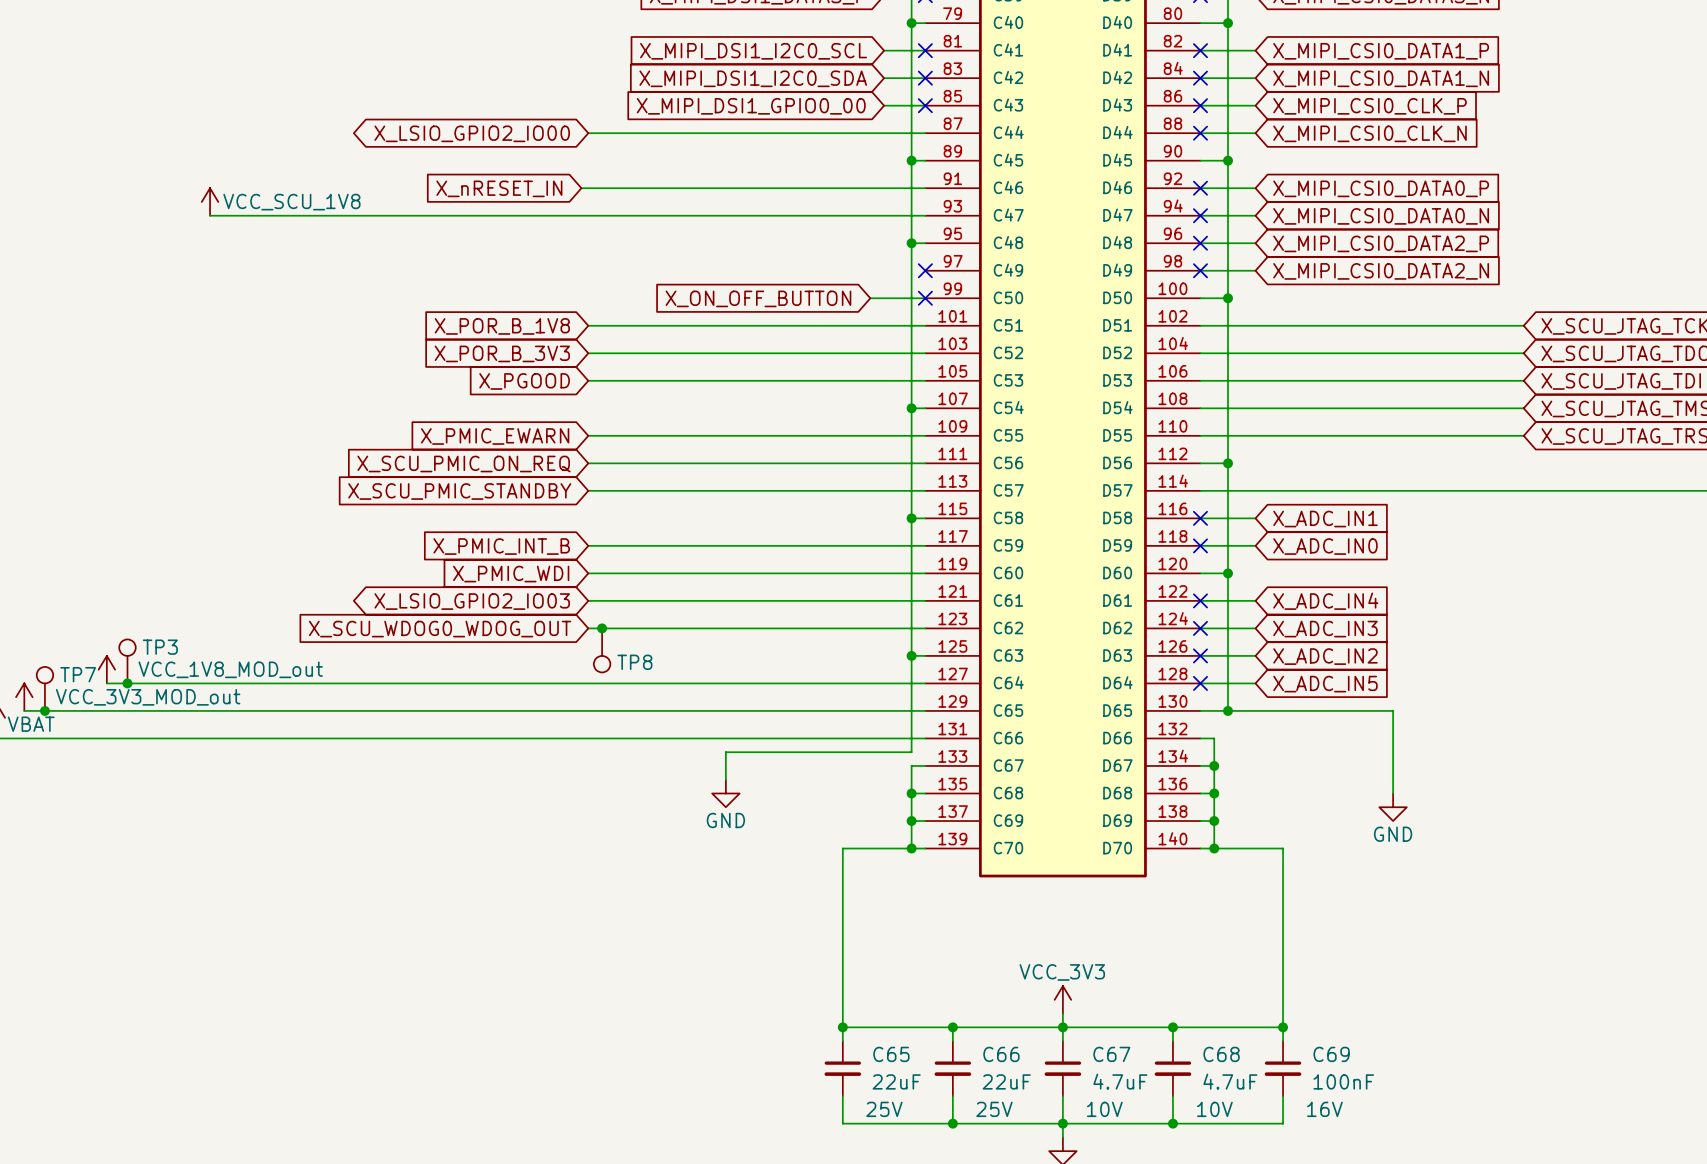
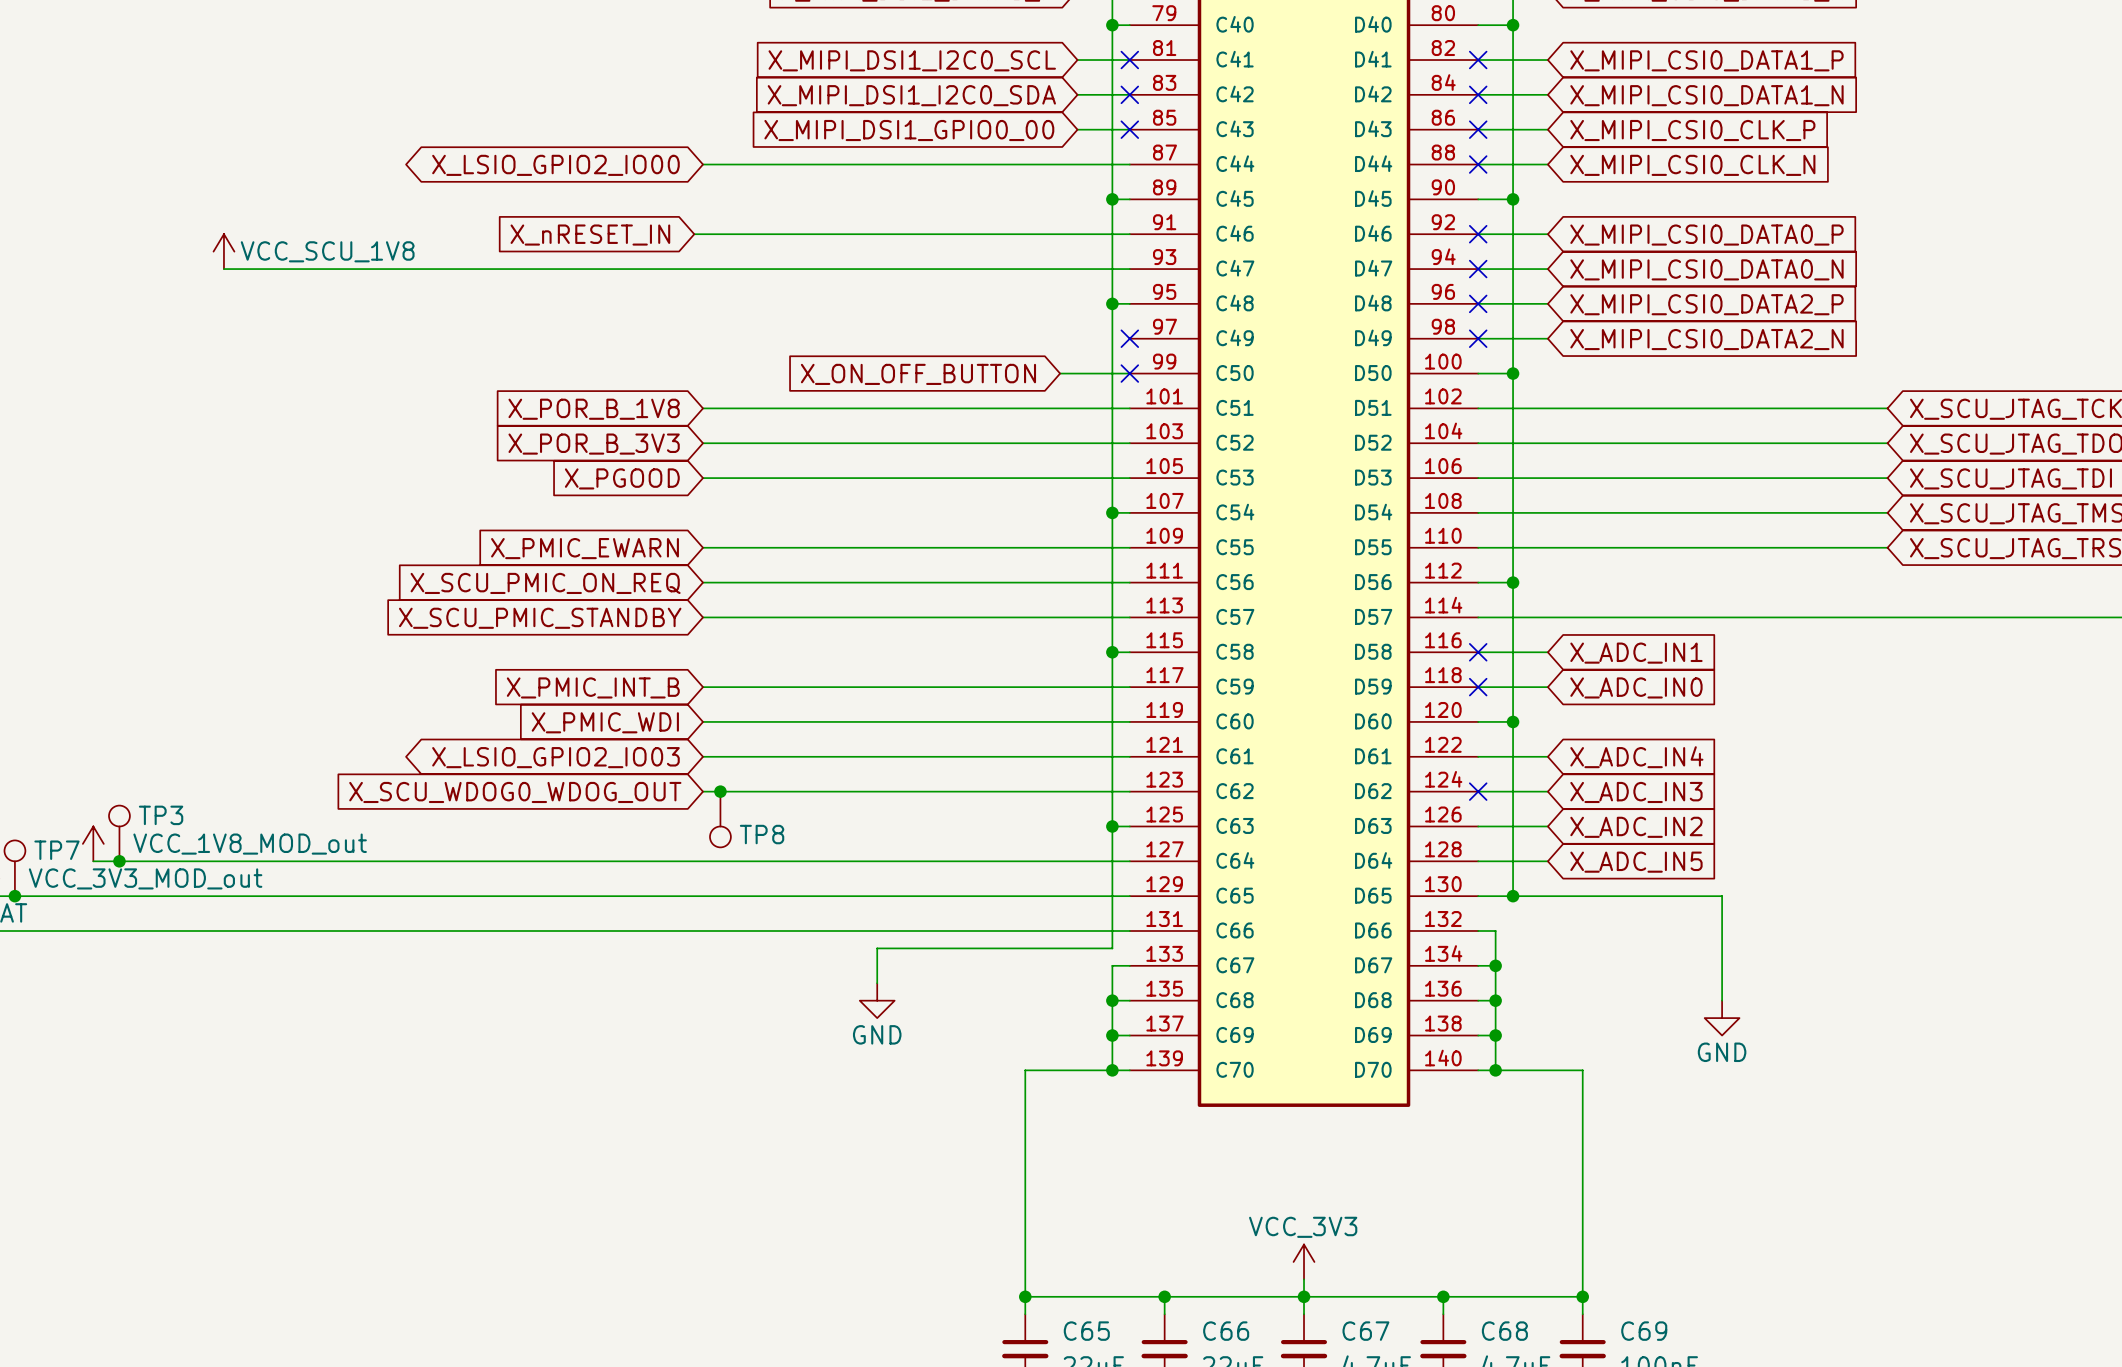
no-connect mark: (1200, 600) -> none
no-connect mark: (1200, 655) -> none
no-connect mark: (1200, 683) -> none

